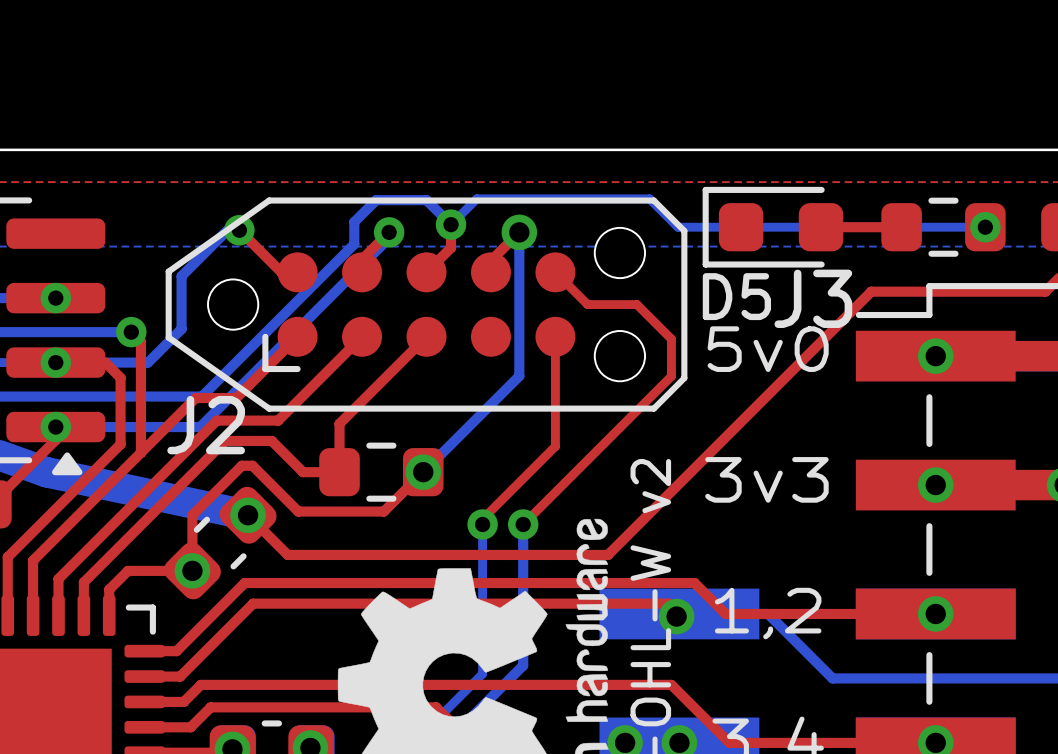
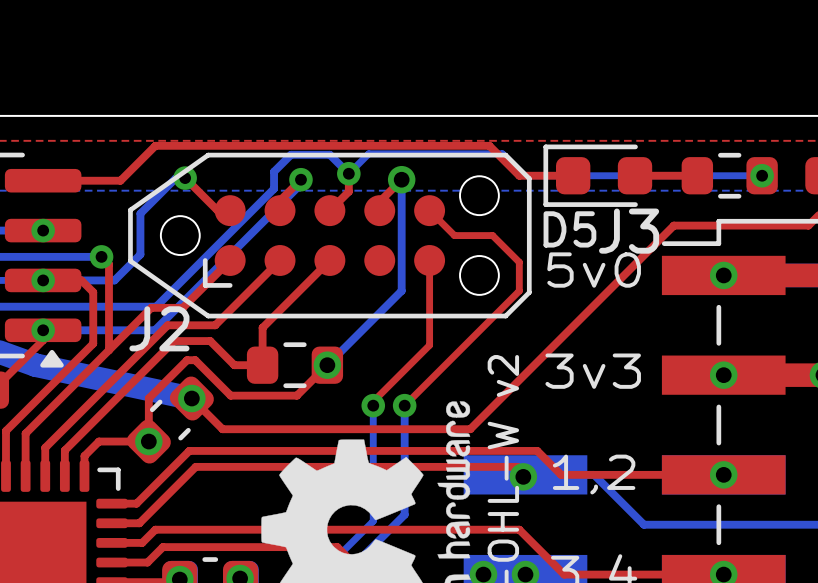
top track: none -> (573, 175) (519, 175) (489, 145) (155, 145) (120, 180) (43, 180)

